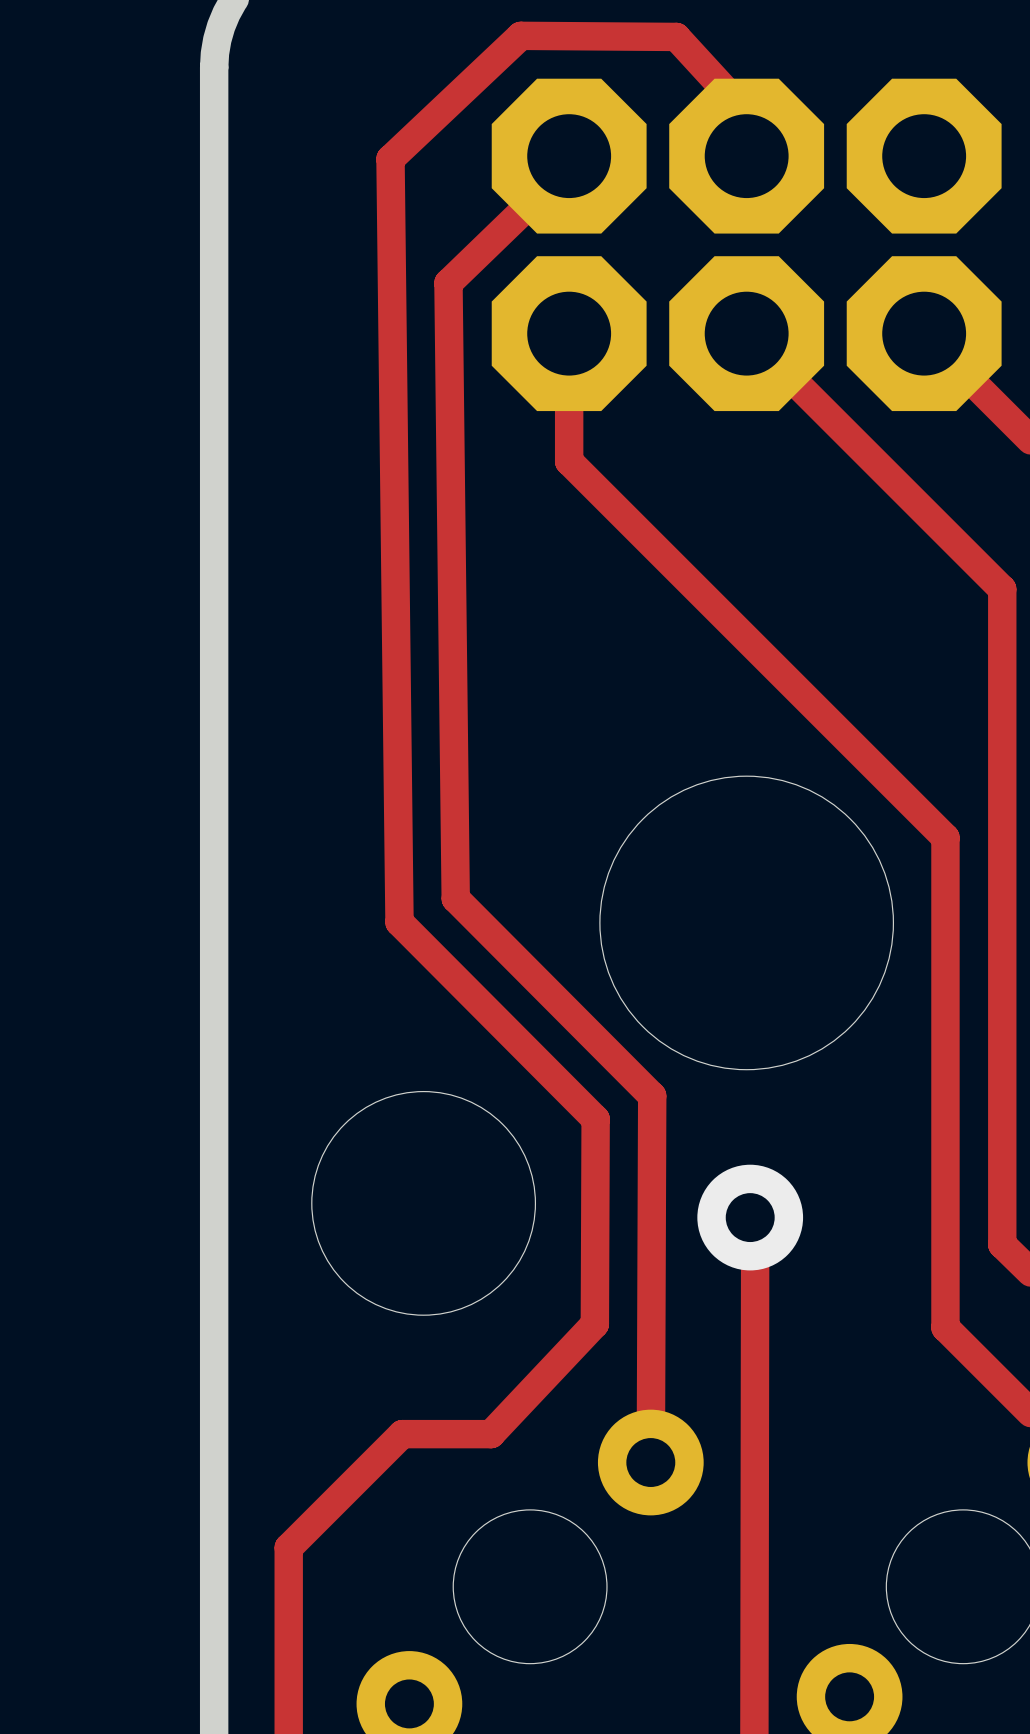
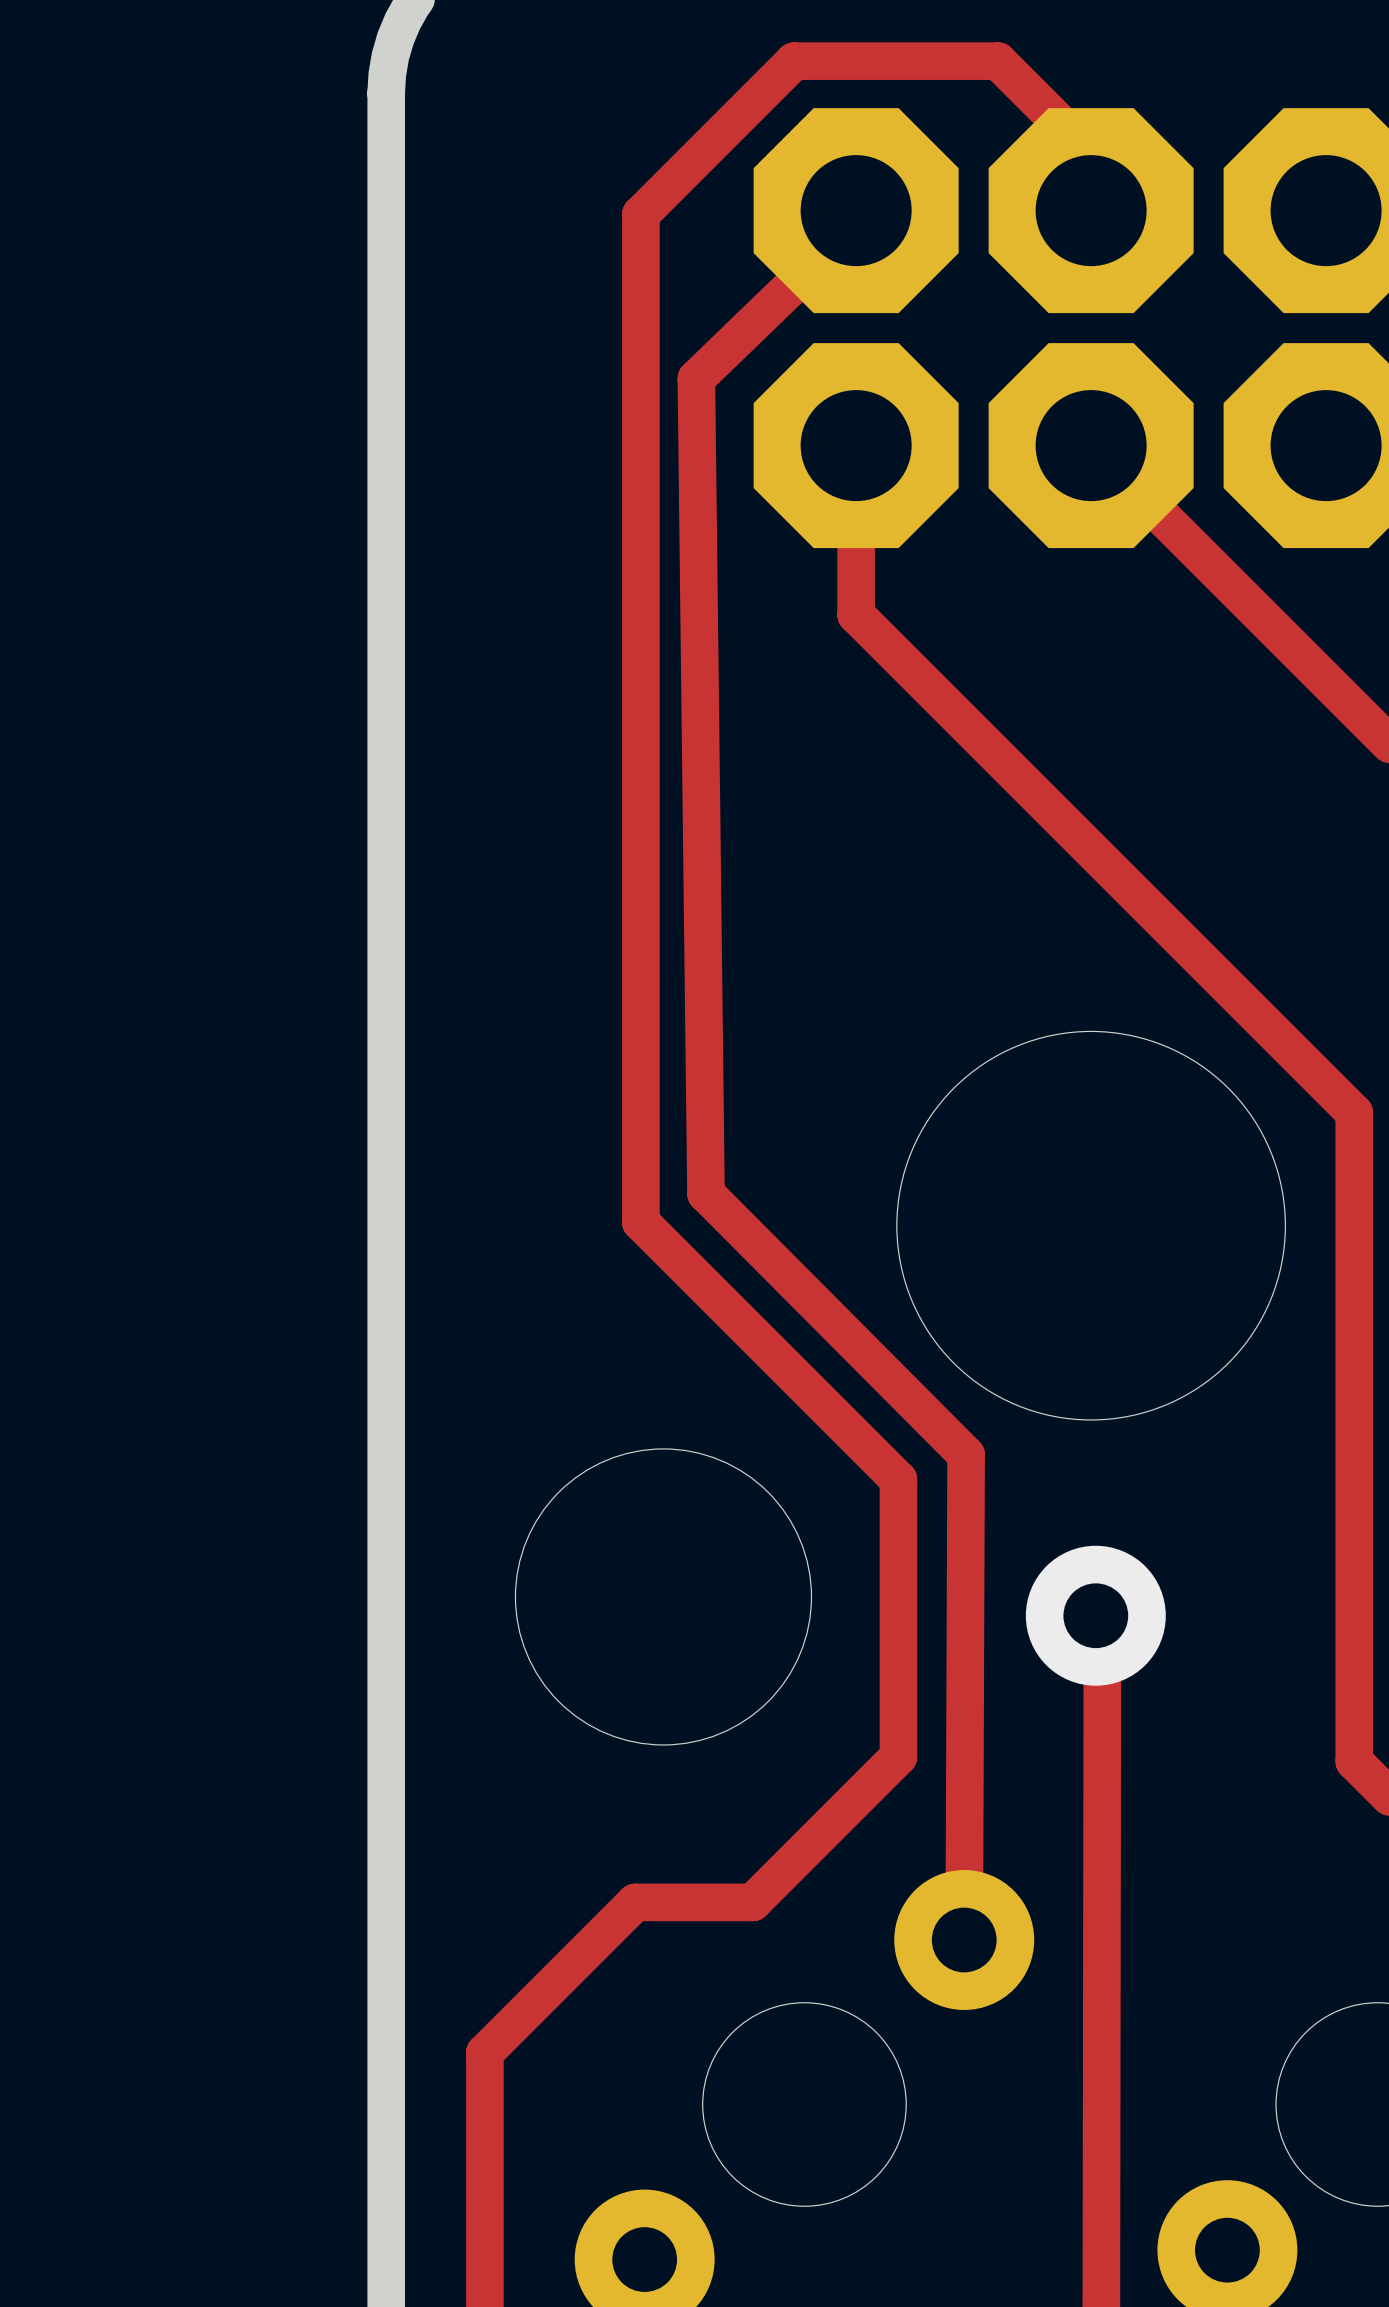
track: (746, 156) (746, 113) (676, 36) (520, 35) (390, 159) (399, 922) (595, 1119) (594, 1324) (491, 1434) -> (1091, 210) (1091, 154) (997, 61) (794, 61) (640, 214) (640, 1222) (898, 1479) (898, 1756) (752, 1902)

